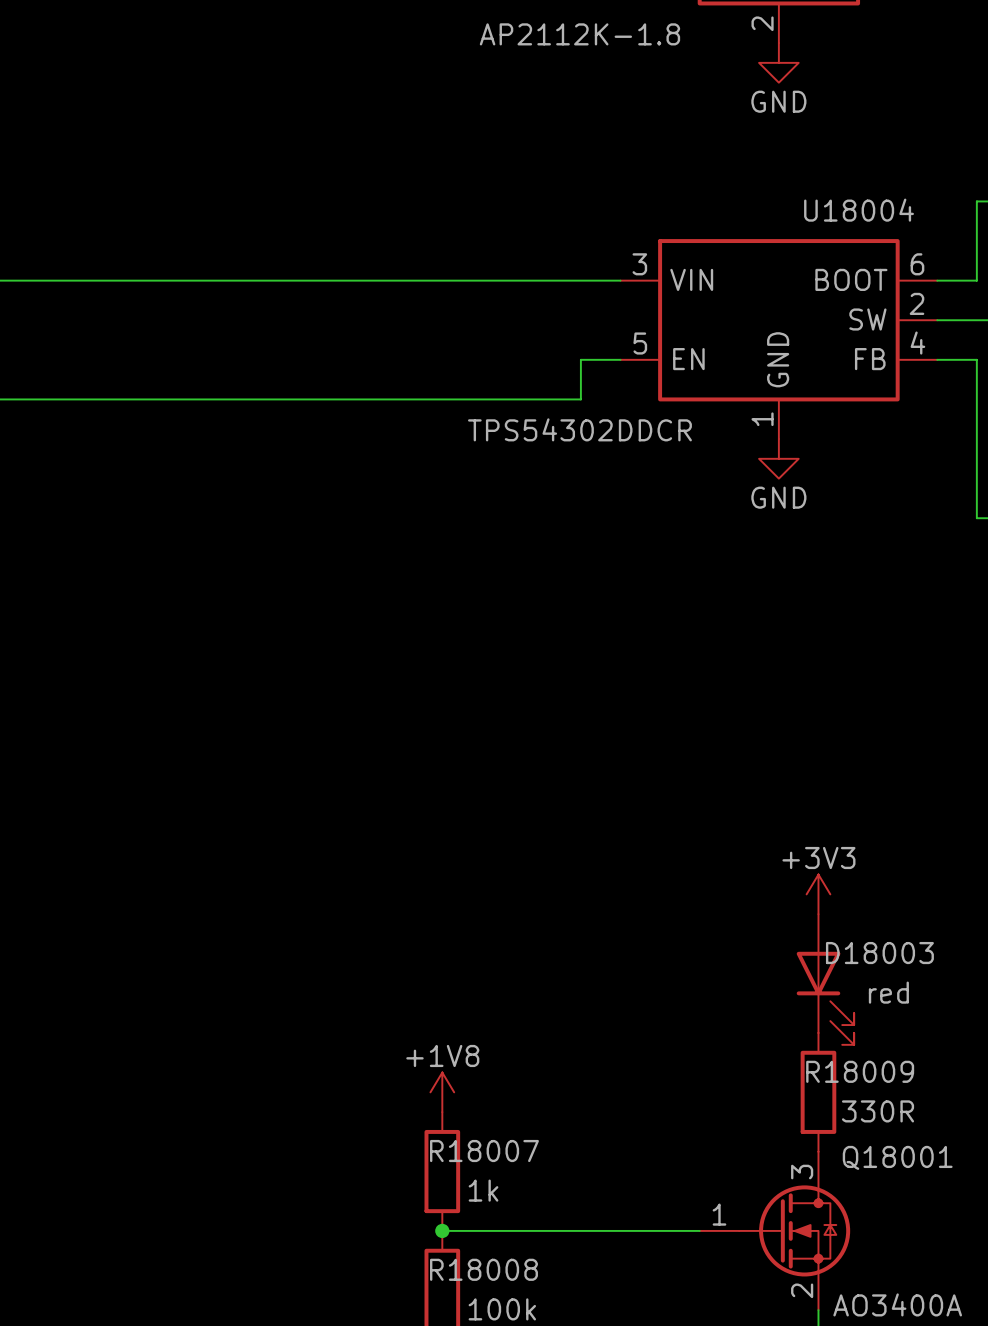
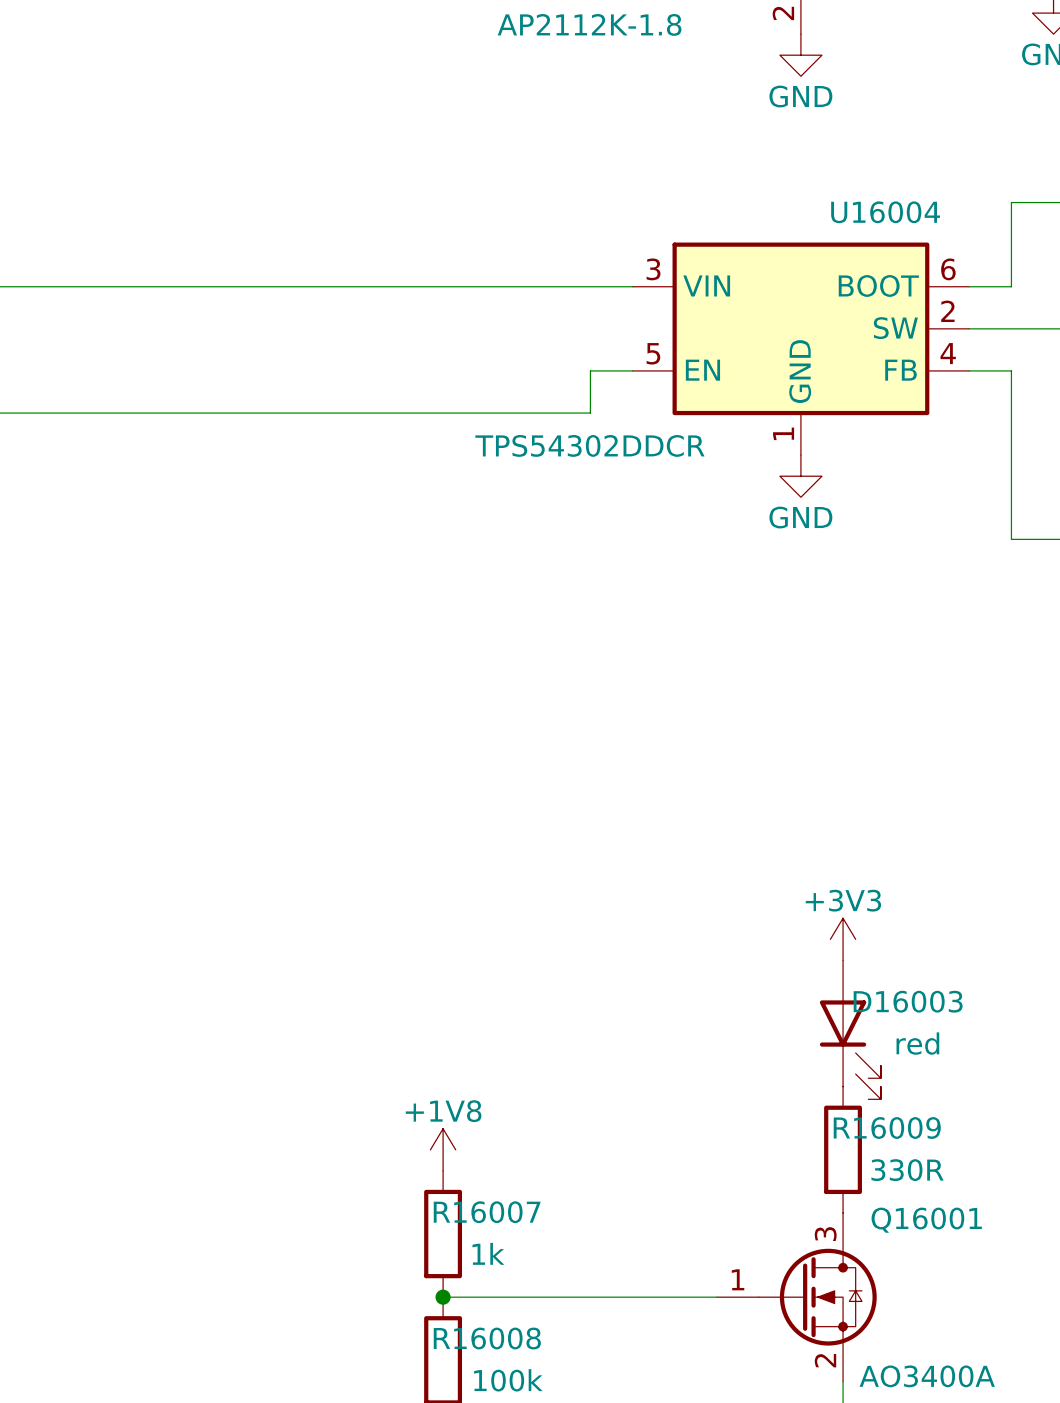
U18004 name: U18004 (859, 210) -> U16004 (885, 212)
D18003 name: D18003 (879, 953) -> D16003 (908, 1001)
R18009 name: R18009 (860, 1071) -> R16009 (887, 1128)
R18007 name: R18007 (484, 1151) -> R16007 (487, 1212)
Q18001 name: Q18001 (897, 1157) -> Q16001 (926, 1220)
R18008 name: R18008 (483, 1269) -> R16008 (487, 1338)

